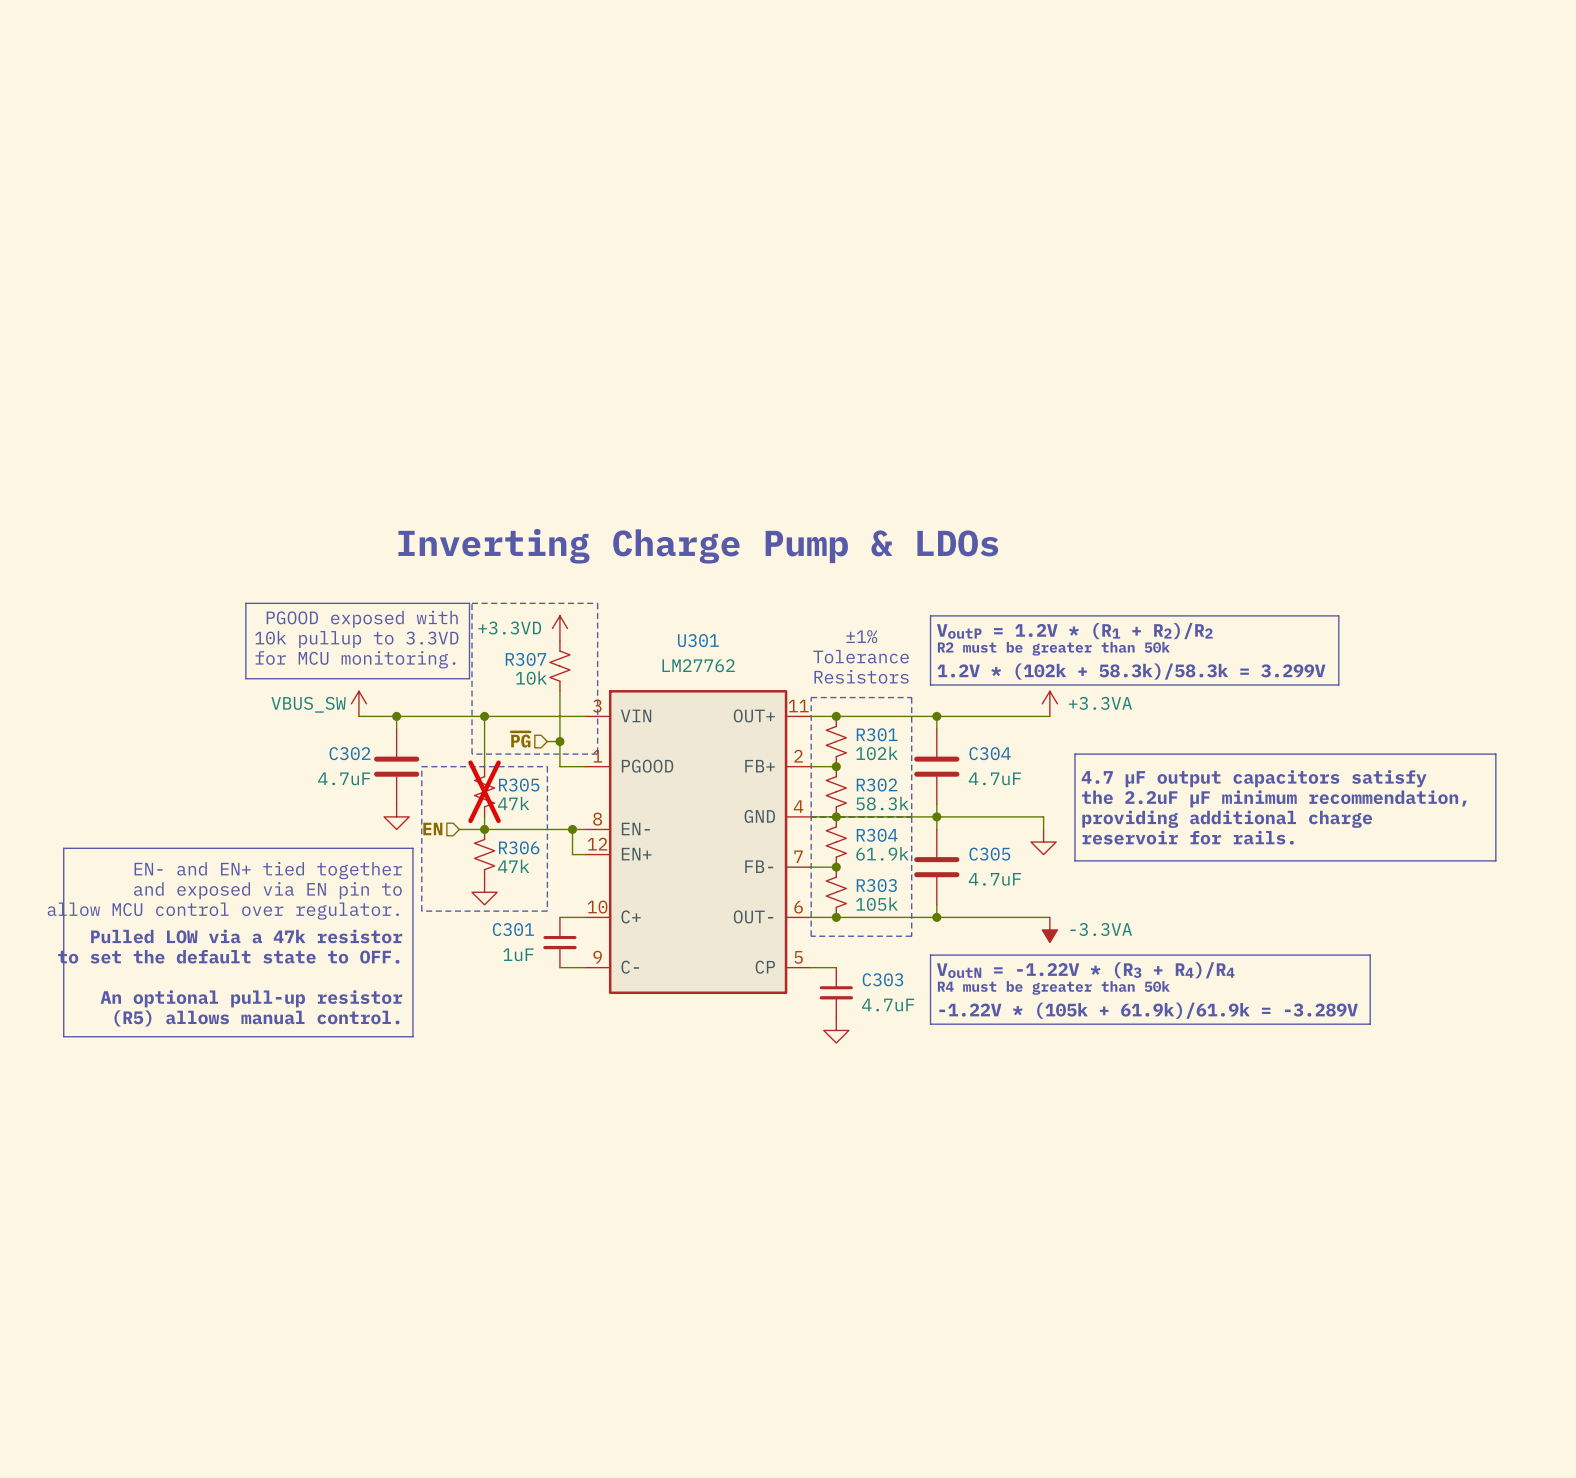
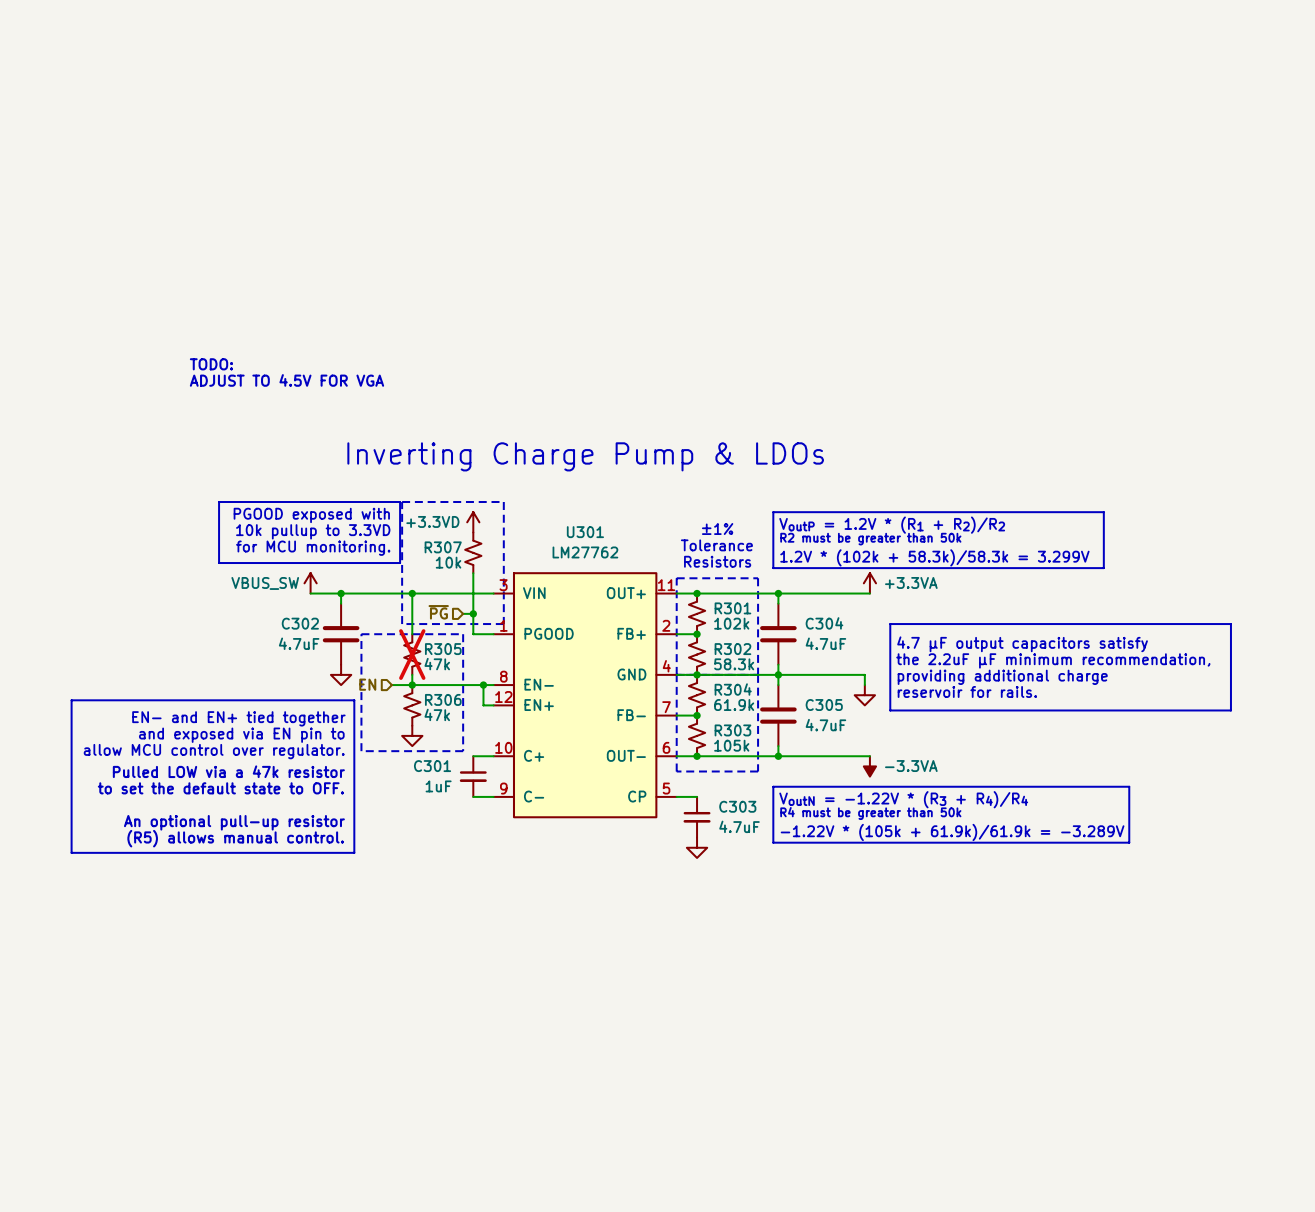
text: none -> TODO: (211, 364)
text: none -> ADJUST TO 4.5V FOR VGA (286, 380)

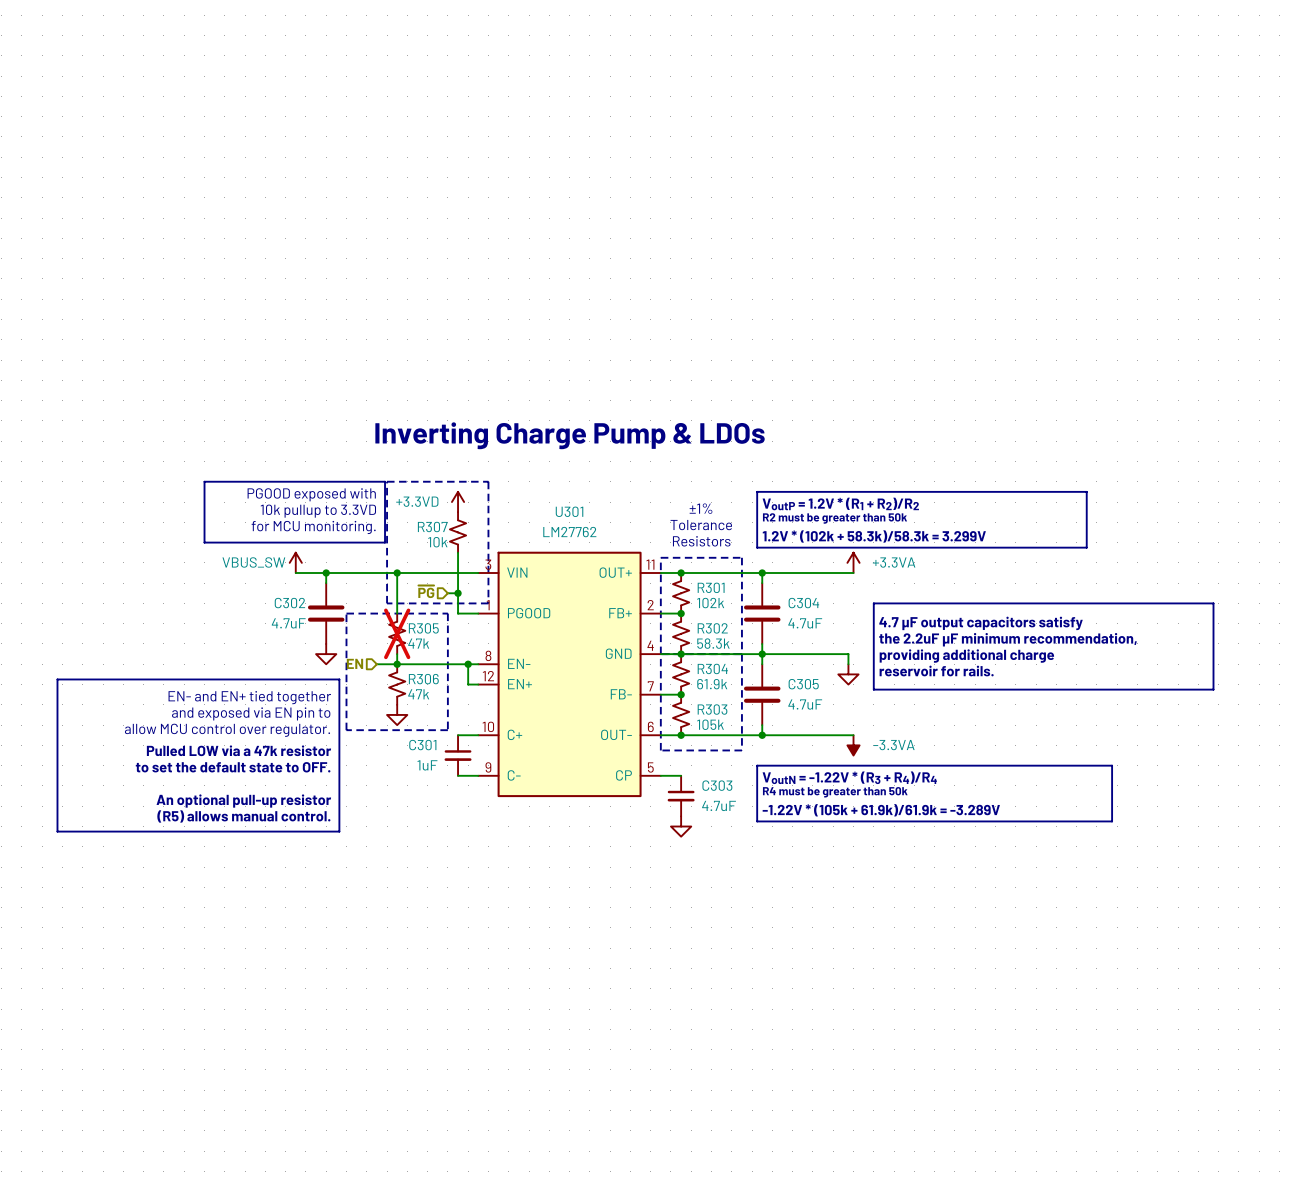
text: TODO: (211, 364) -> none
text: ADJUST TO 4.5V FOR VGA (286, 380) -> none

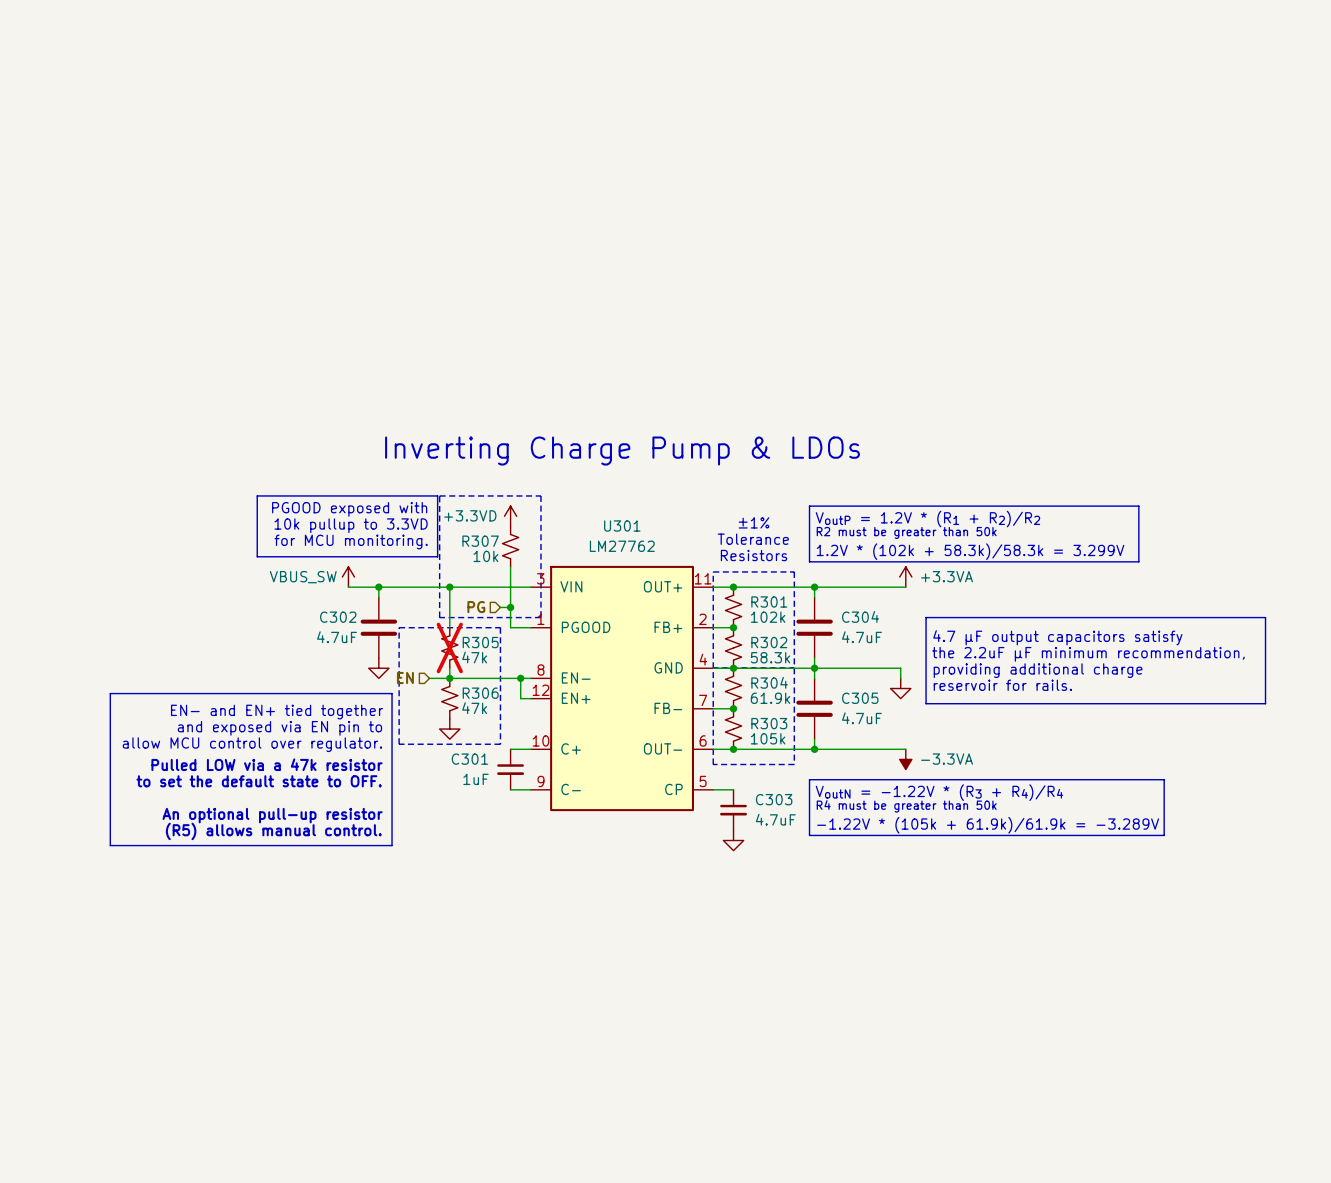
hierarchical label: ~{PG} (426, 591) -> PG (476, 607)

